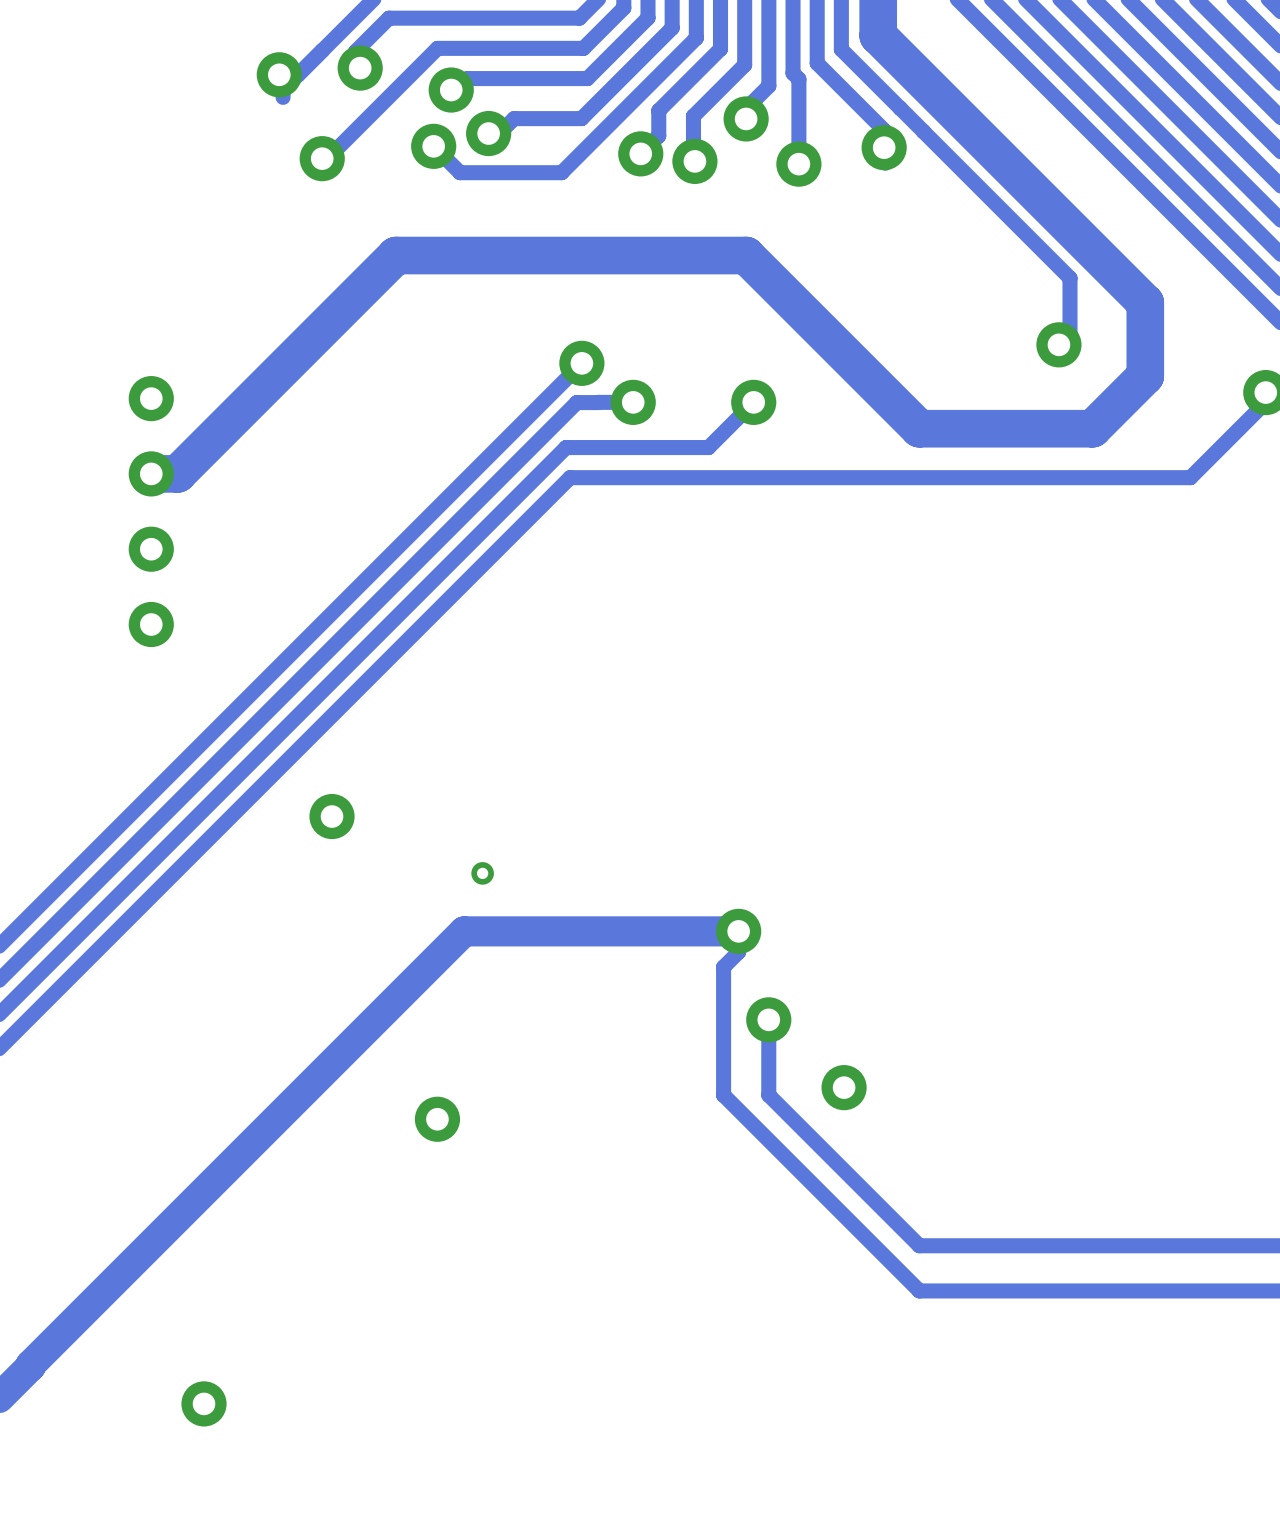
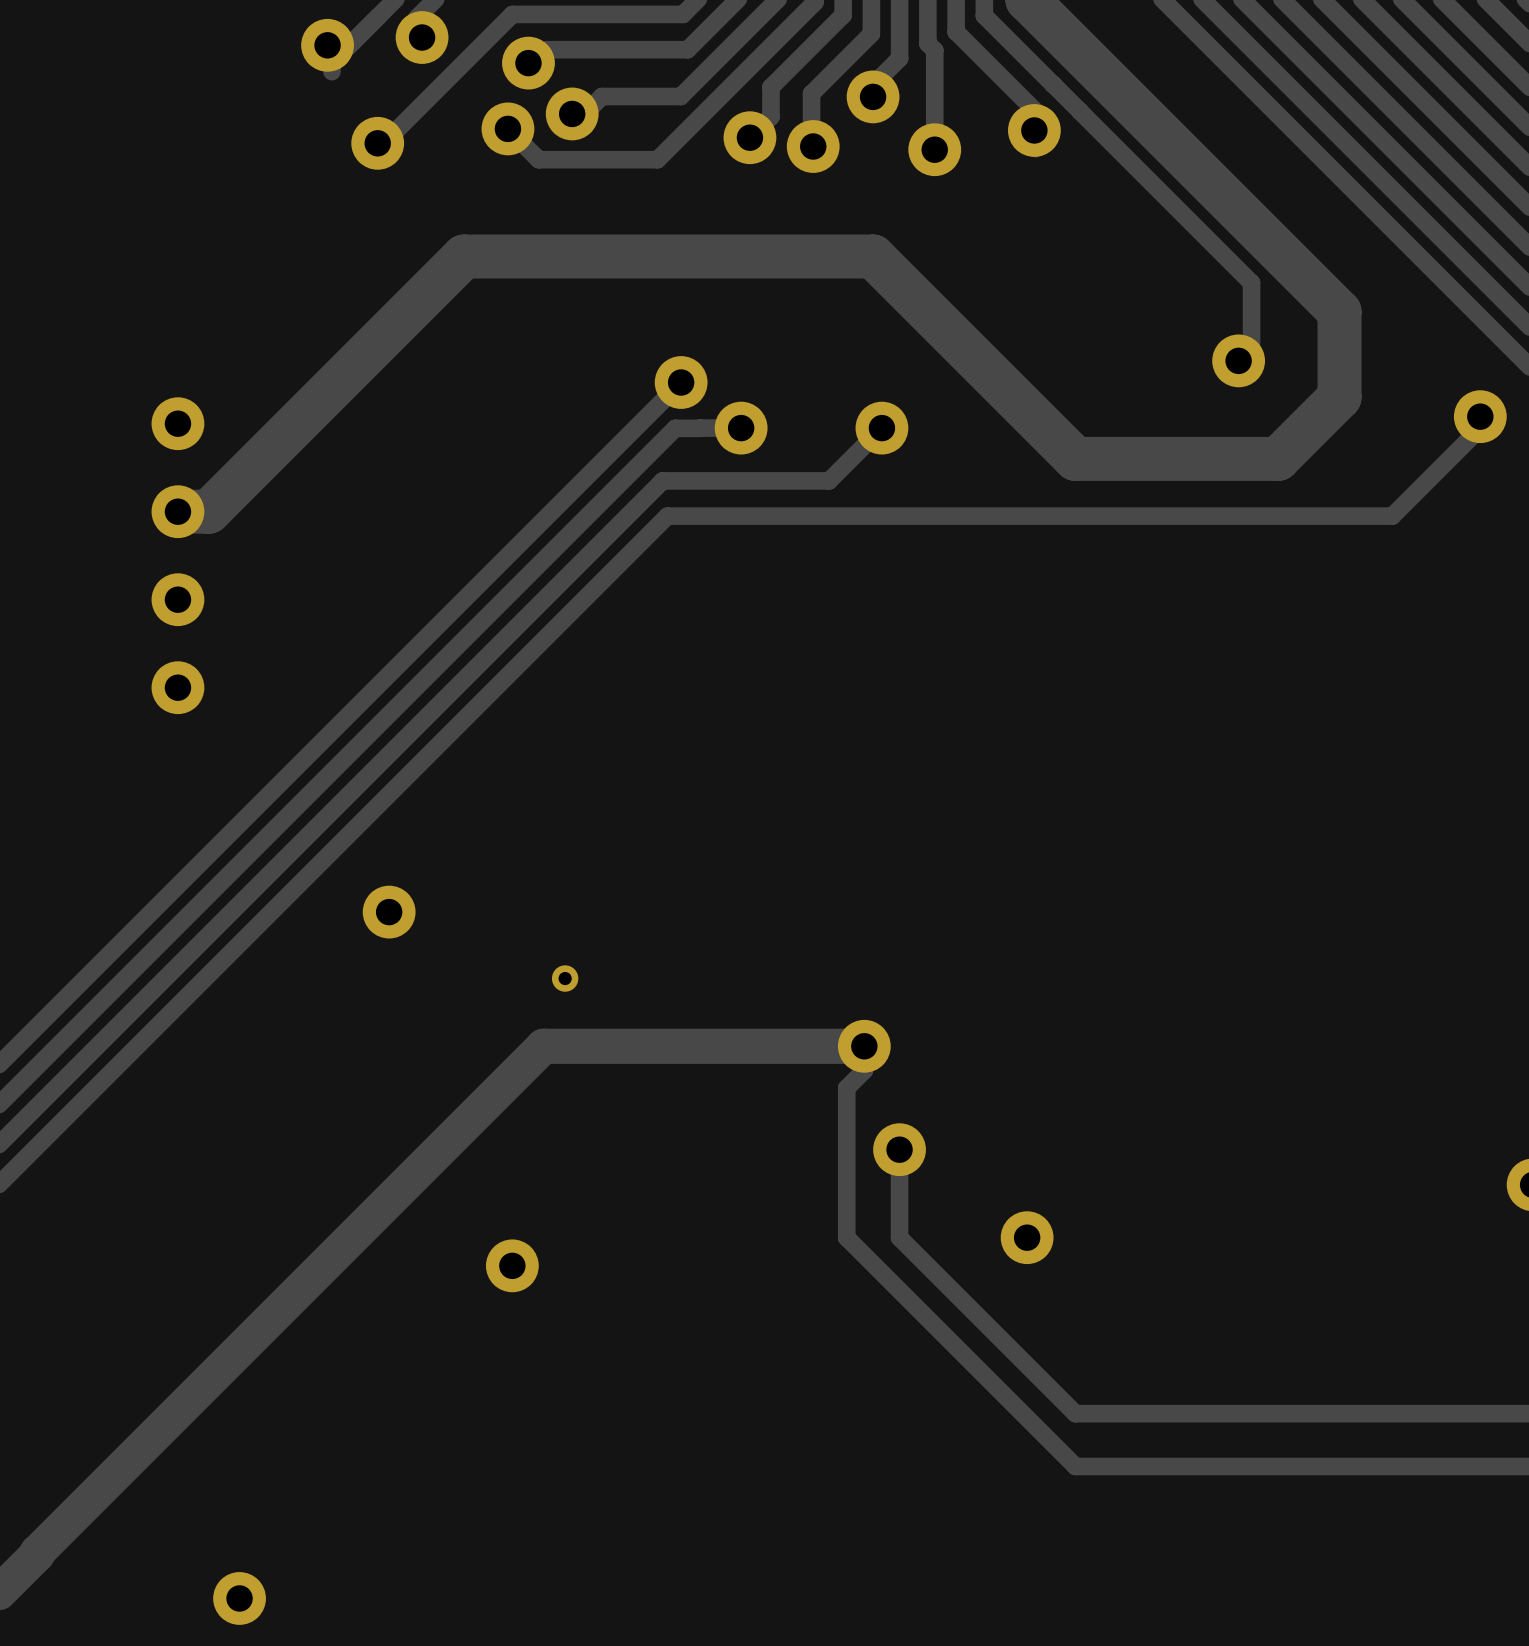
via position: (844, 1087) -> (1027, 1237)

